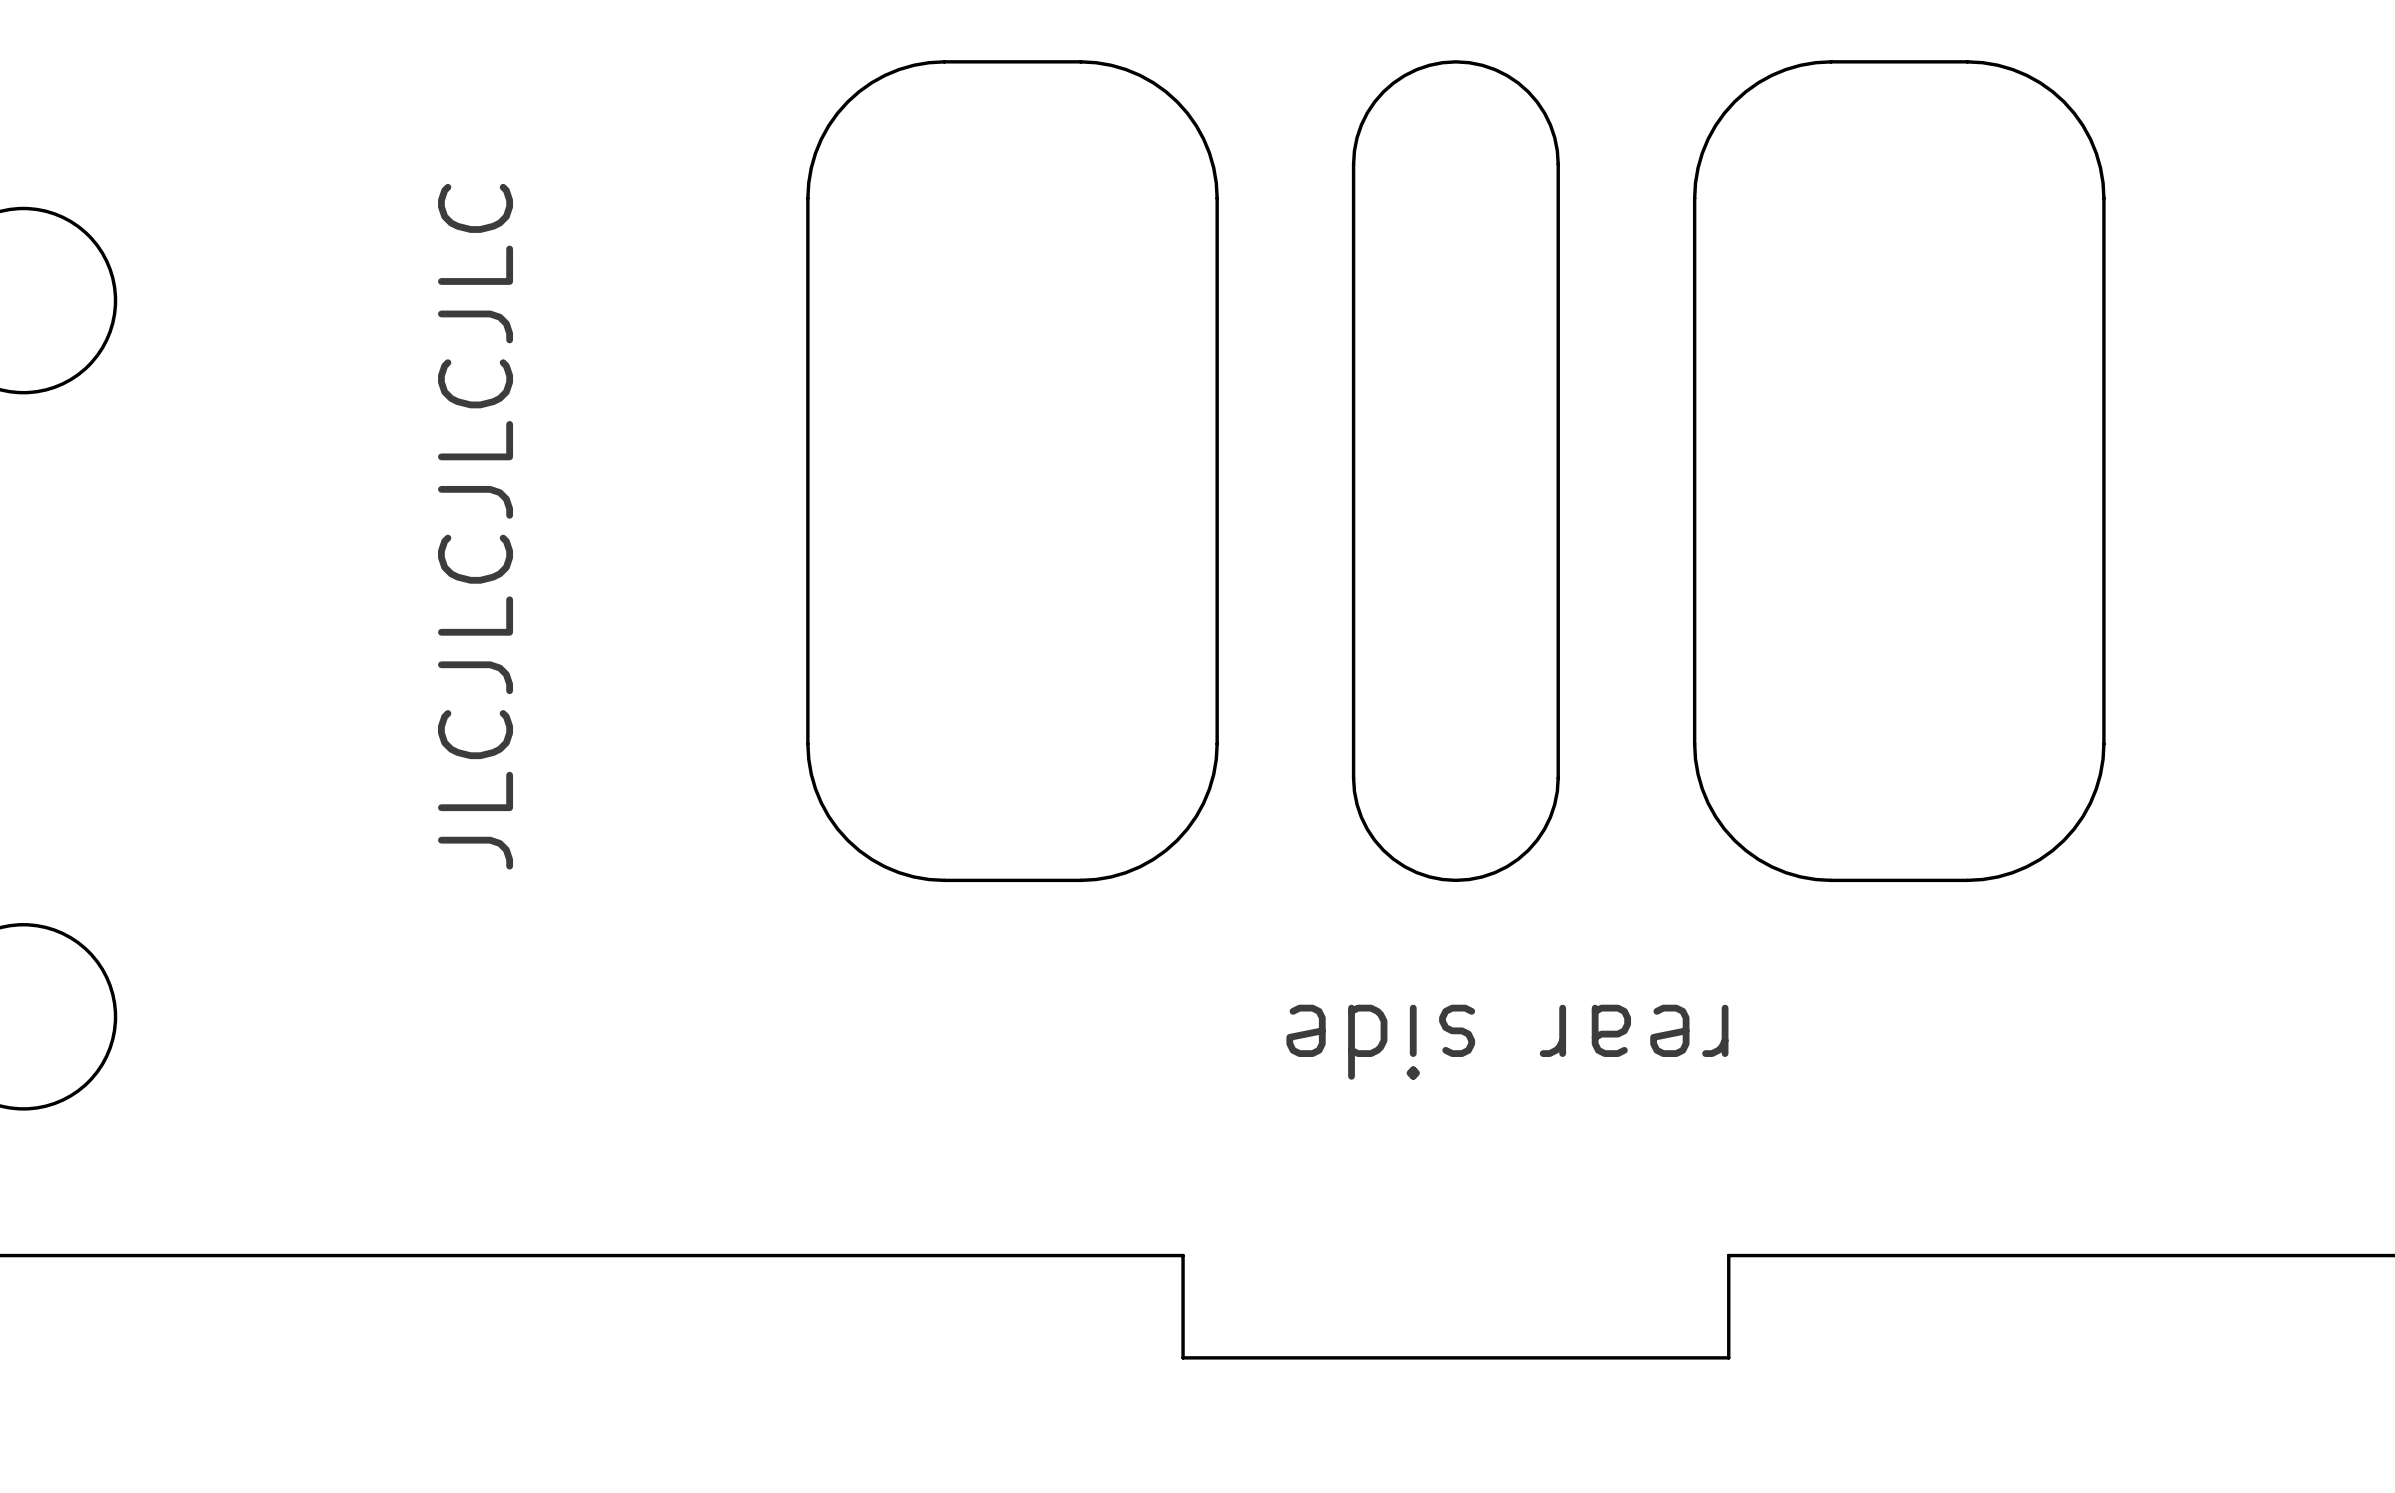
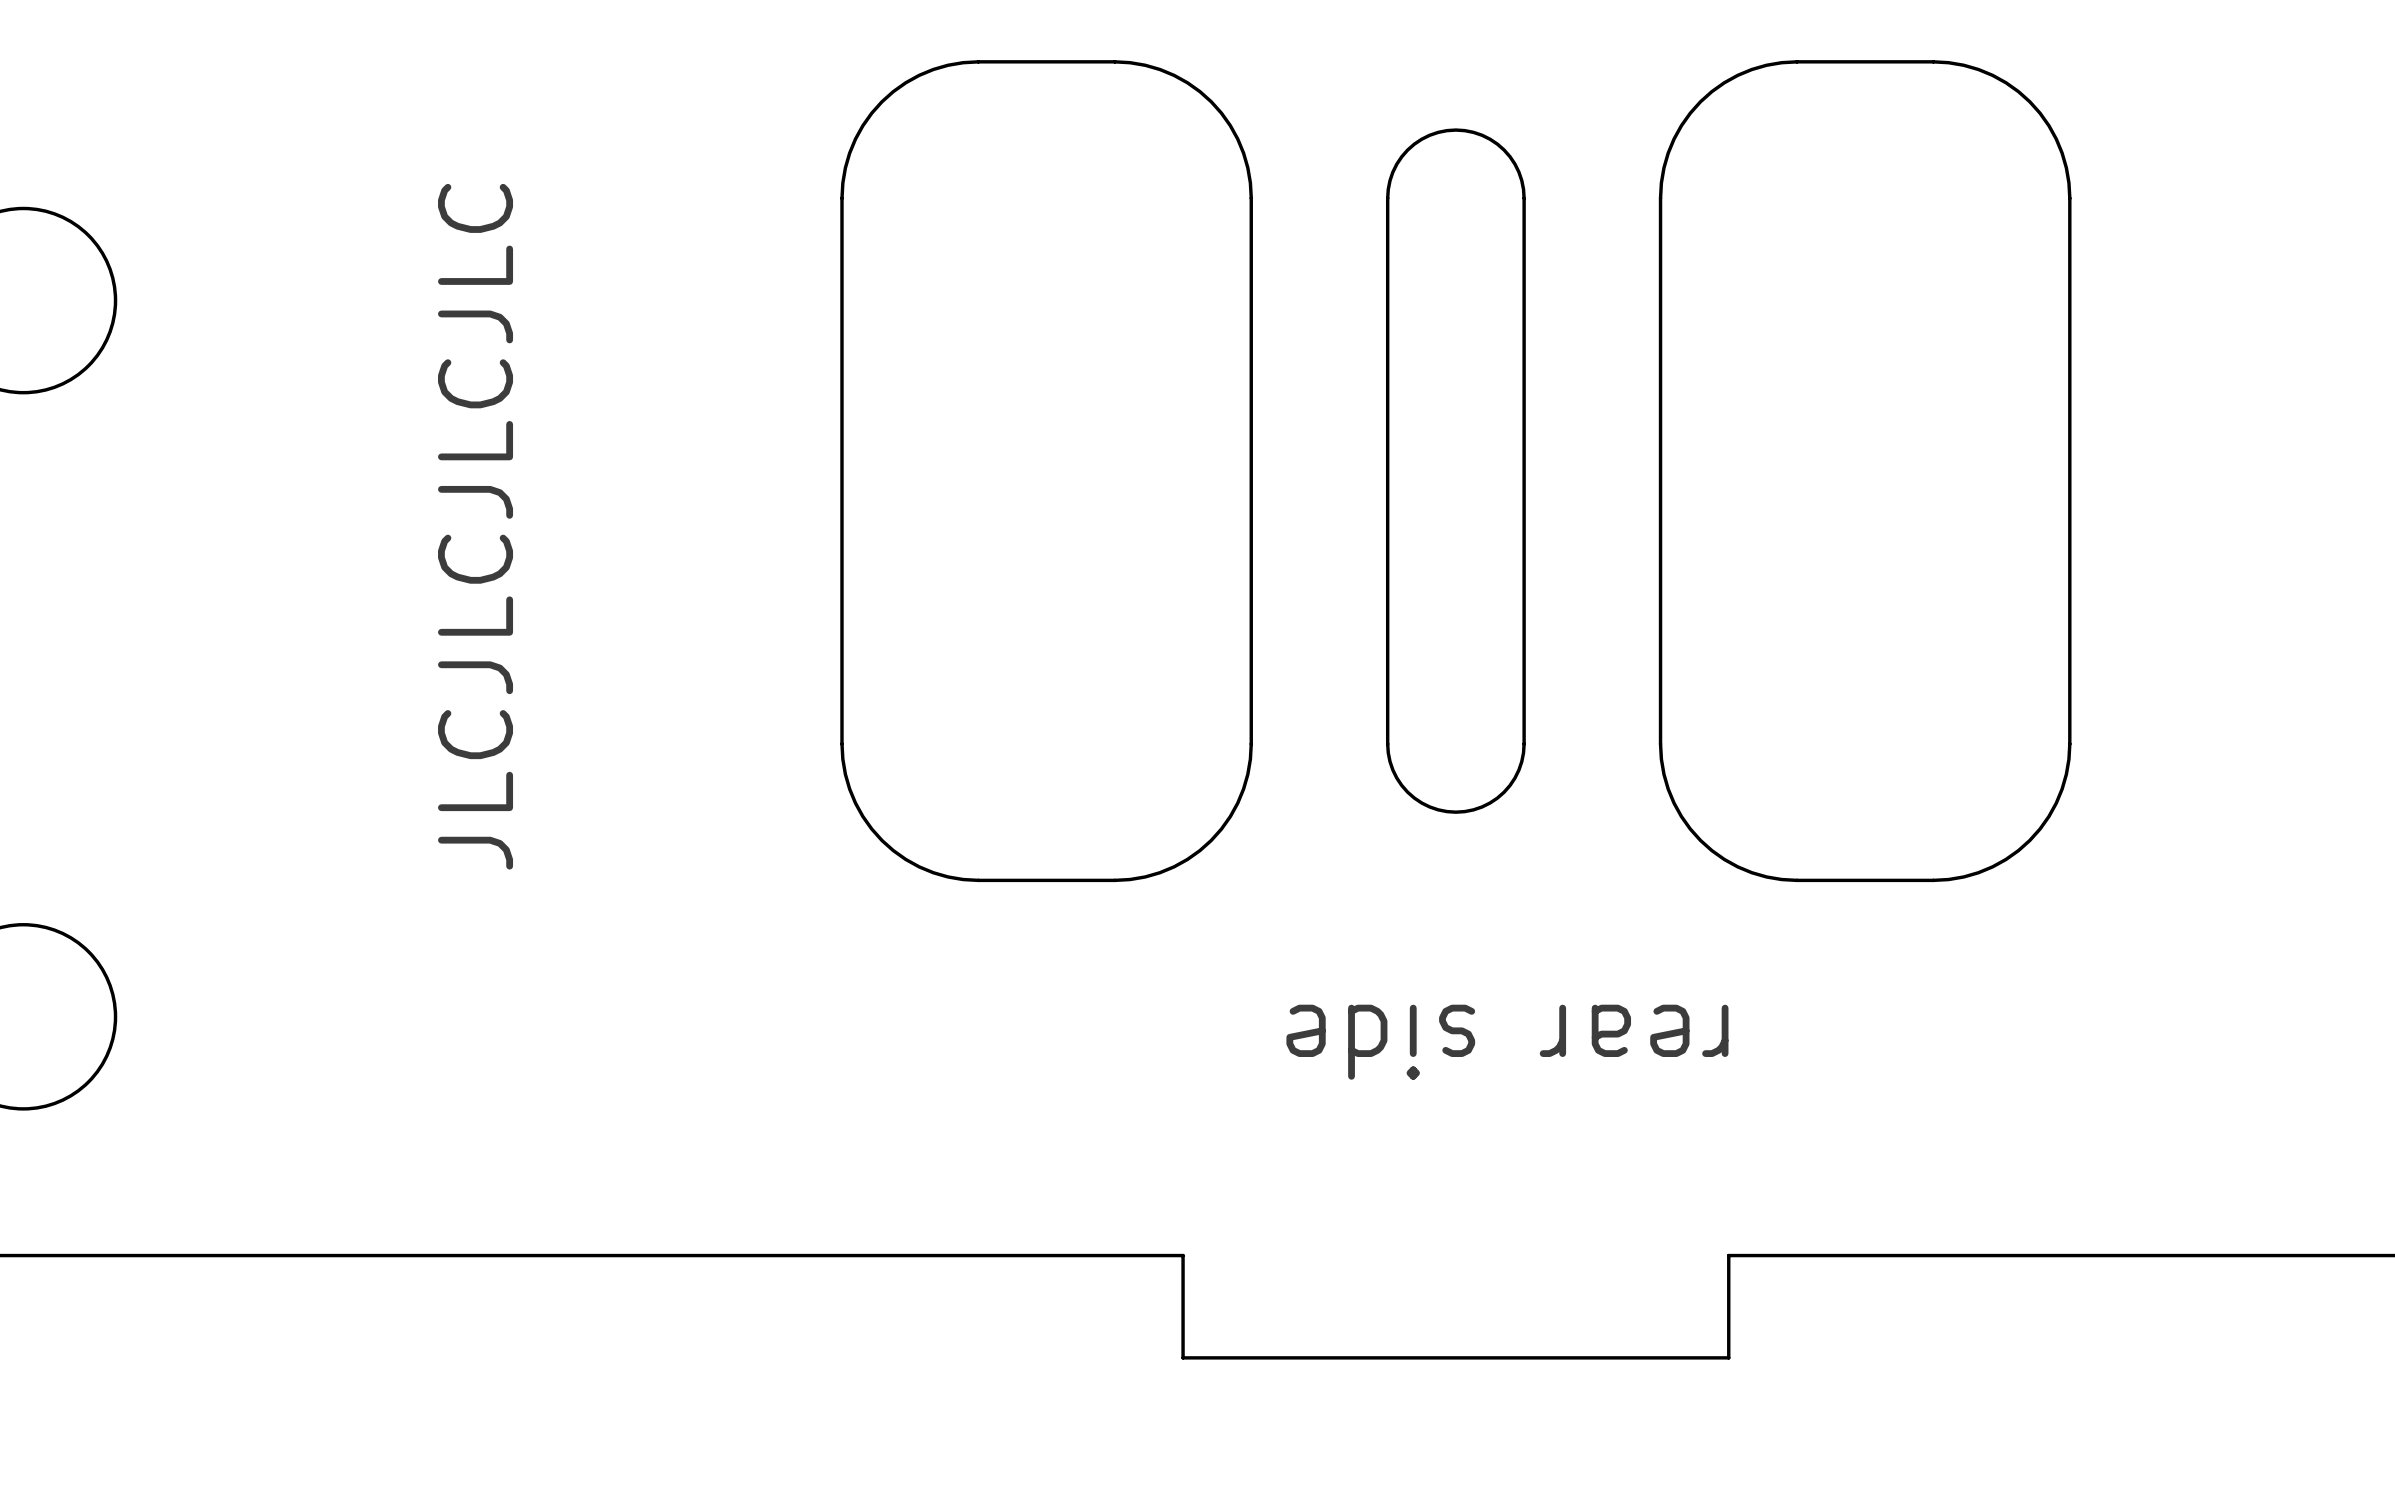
board edge: (978, 61) (944, 61) (913, 65) (899, 69) (871, 82) (847, 101) (828, 125) (815, 153) (811, 167) (807, 198) (807, 743) (811, 774) (821, 803) (837, 829) (859, 850) (885, 866) (913, 876) (944, 880) (978, 880) -> (978, 61) (963, 62) (933, 69) (905, 82) (893, 91) (881, 101) (862, 125) (849, 153) (845, 167) (841, 198) (841, 743) (845, 774) (855, 803) (862, 816) (881, 840) (905, 859) (919, 866) (948, 876) (978, 880)
board edge: (1080, 61) (1111, 65) (1125, 69) (1153, 82) (1165, 91) (1187, 113) (1196, 125) (1203, 139) (1213, 167) (1217, 198) (1217, 743) (1213, 774) (1203, 803) (1196, 816) (1177, 840) (1165, 850) (1139, 866) (1111, 876) (1080, 880) -> (1080, 61) (1114, 61) (1145, 65) (1159, 69) (1187, 82) (1211, 101) (1221, 113) (1237, 139) (1247, 167) (1251, 198) (1251, 743) (1247, 774) (1237, 803) (1221, 829) (1199, 850) (1174, 866) (1145, 876) (1114, 880) (1080, 880)
board edge: (1831, 61) (1800, 65) (1786, 69) (1771, 75) (1746, 91) (1734, 101) (1715, 125) (1708, 139) (1698, 167) (1694, 198) (1694, 743) (1698, 774) (1708, 803) (1724, 829) (1734, 840) (1758, 859) (1786, 872) (1815, 879) (1831, 880) -> (1831, 61) (1796, 61) (1766, 65) (1751, 69) (1724, 82) (1700, 101) (1690, 113) (1674, 139) (1663, 167) (1660, 198) (1660, 743) (1663, 774) (1674, 803) (1690, 829) (1711, 850) (1737, 866) (1766, 876) (1796, 880) (1831, 880)
board edge: (1933, 61) (1967, 61) (1997, 65) (2026, 75) (2040, 82) (2063, 101) (2074, 113) (2090, 139) (2100, 167) (2103, 198) (2103, 743) (2100, 774) (2090, 803) (2074, 829) (2052, 850) (2026, 866) (1997, 876) (1967, 880) (1933, 880) -> (1933, 61) (1948, 62) (1978, 69) (2005, 82) (2018, 91) (2029, 101) (2048, 125) (2062, 153) (2066, 167) (2069, 198) (2069, 743) (2066, 774) (2056, 803) (2040, 829) (2029, 840) (2018, 850) (1992, 866) (1963, 876) (1933, 880)
board edge: (1558, 164) (1557, 791) (1554, 804) (1544, 829) (1537, 840) (1518, 859) (1507, 866) (1482, 876) (1455, 880) (1442, 879) (1429, 876) (1404, 866) (1383, 850) (1367, 829) (1357, 804) (1354, 791) (1354, 150) (1361, 125) (1367, 113) (1374, 101) (1393, 82) (1404, 75) (1429, 65) (1455, 61) (1482, 65) (1495, 69) (1518, 82) (1528, 91) (1537, 101) (1550, 125) (1554, 137) (1558, 164) -> (1524, 198) (1523, 752) (1514, 778) (1497, 798) (1473, 809) (1447, 811) (1421, 803) (1407, 792) (1396, 778) (1388, 752) (1388, 189) (1396, 164) (1407, 150) (1429, 135) (1455, 130) (1482, 135) (1504, 150) (1518, 172) (1524, 198)

